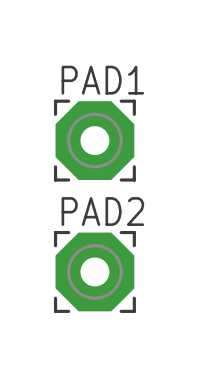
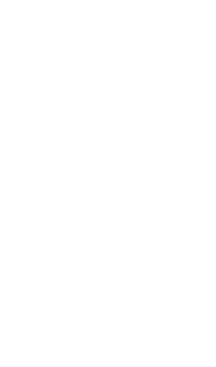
PAD1: (94, 140) -> none
PAD2: (94, 271) -> none

